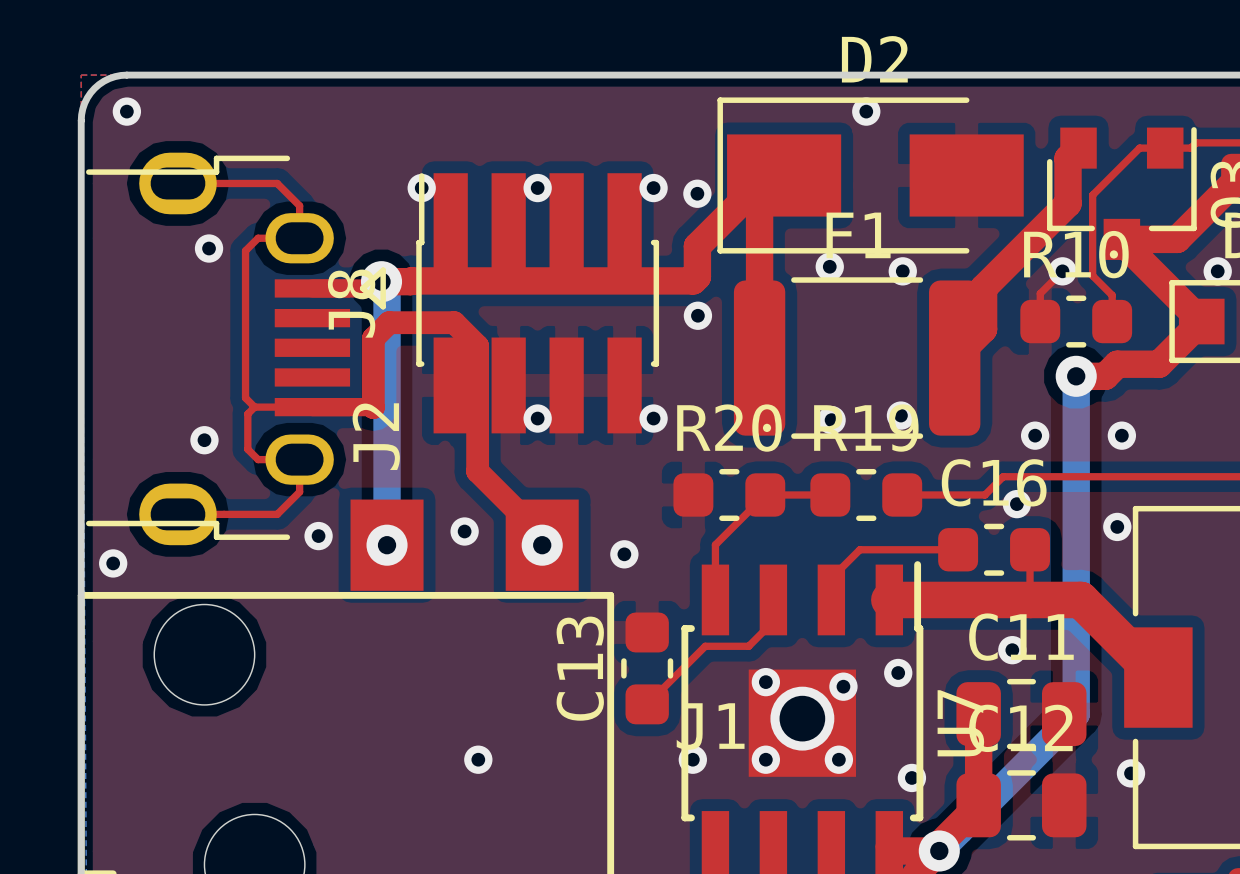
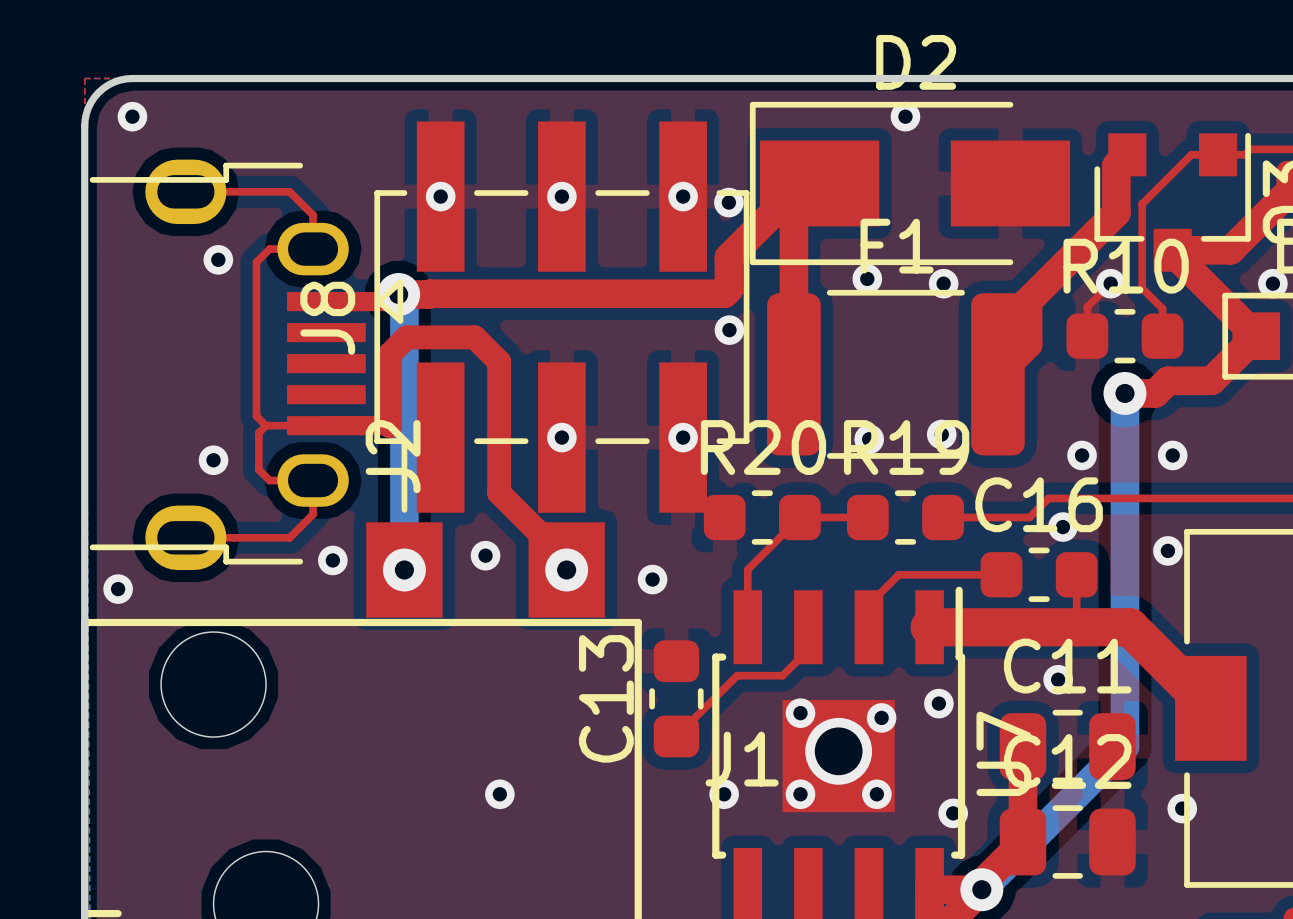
J8 footprint: [416, 173, 660, 434] -> [374, 121, 750, 513]

